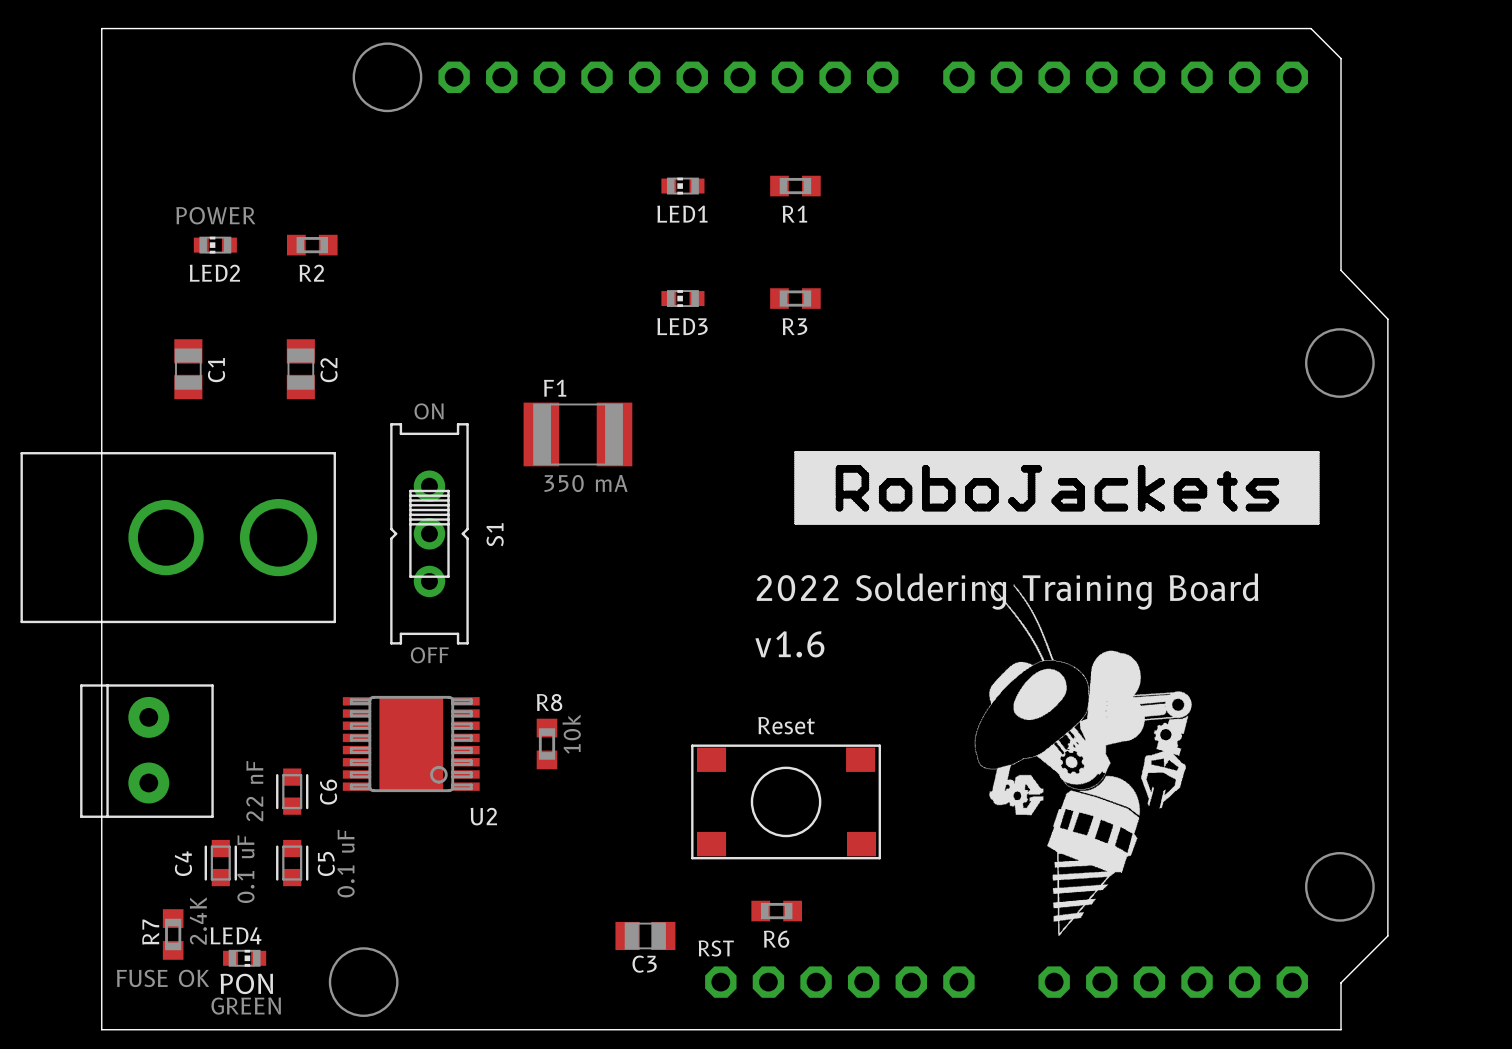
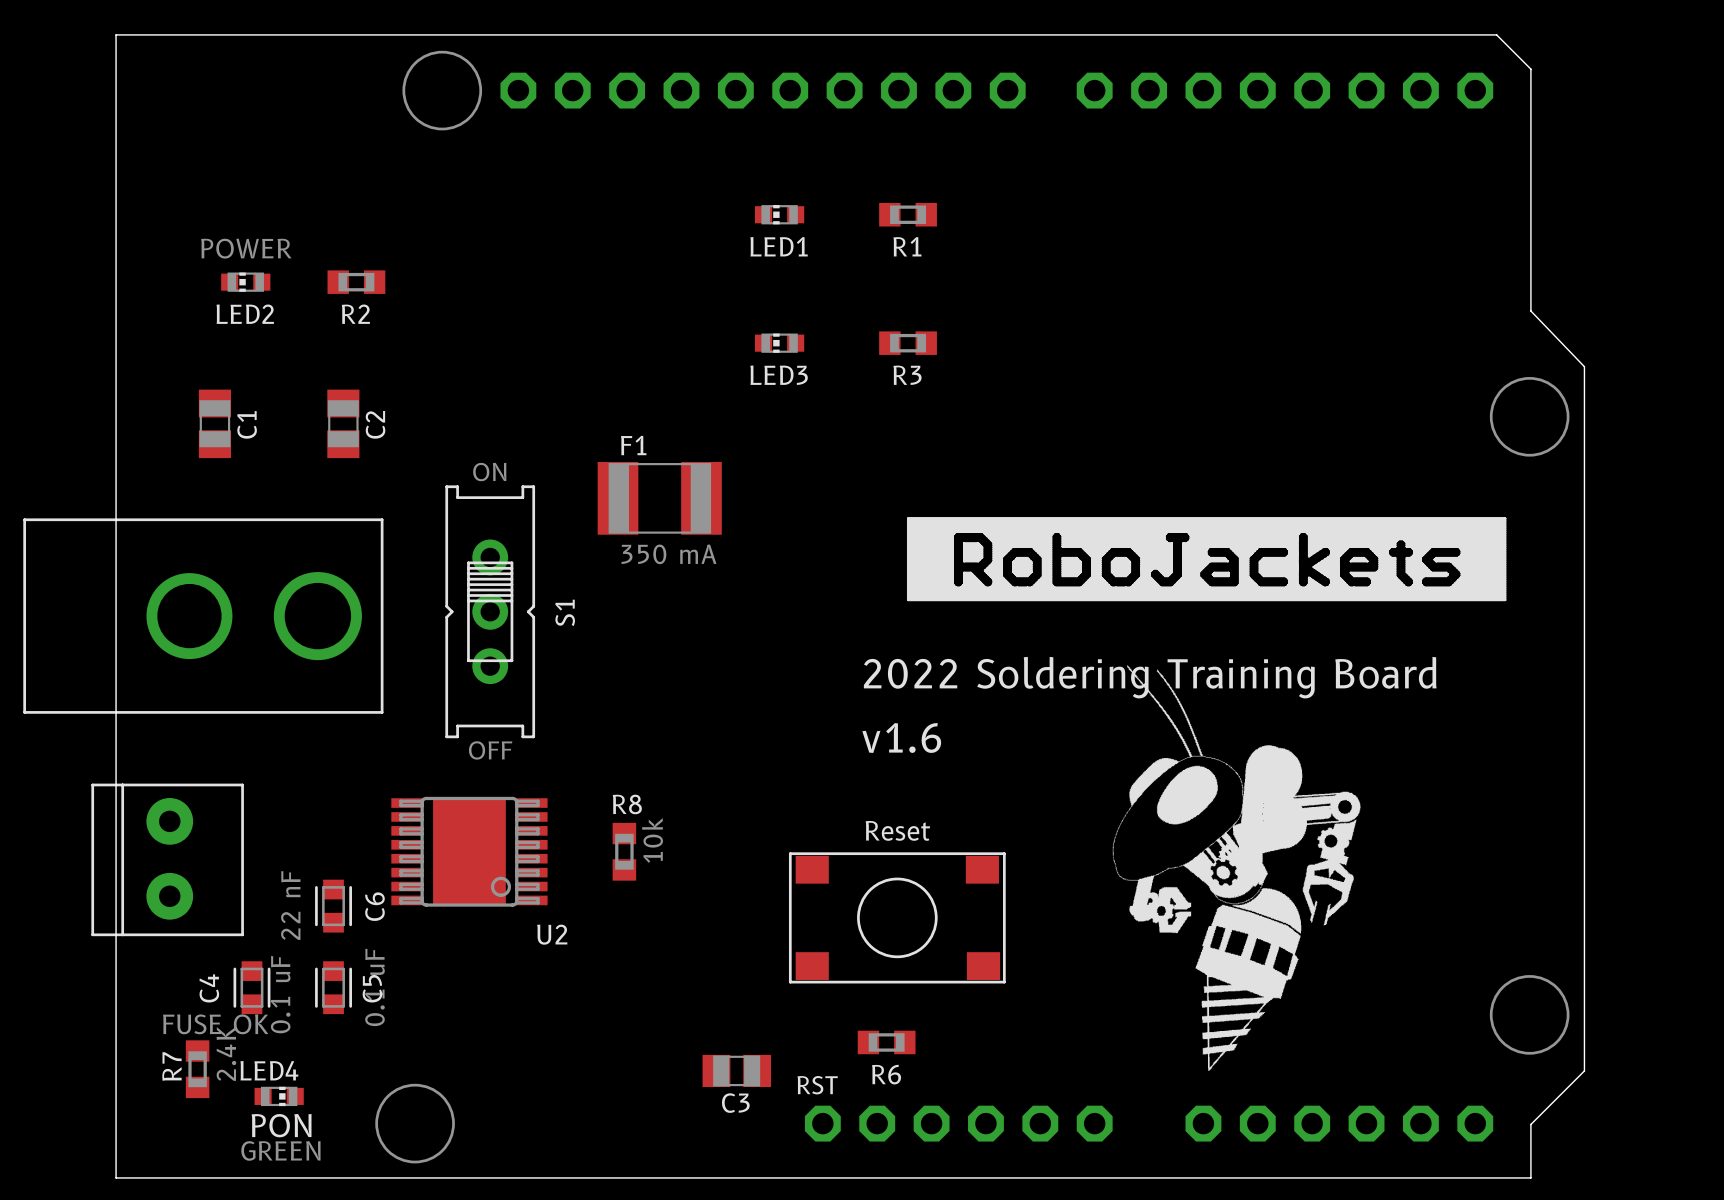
C5 value position: 0.1 uF (346, 863) -> 0.1 uF (374, 987)
text position: FUSE OK (163, 978) -> FUSE OK (215, 1024)

